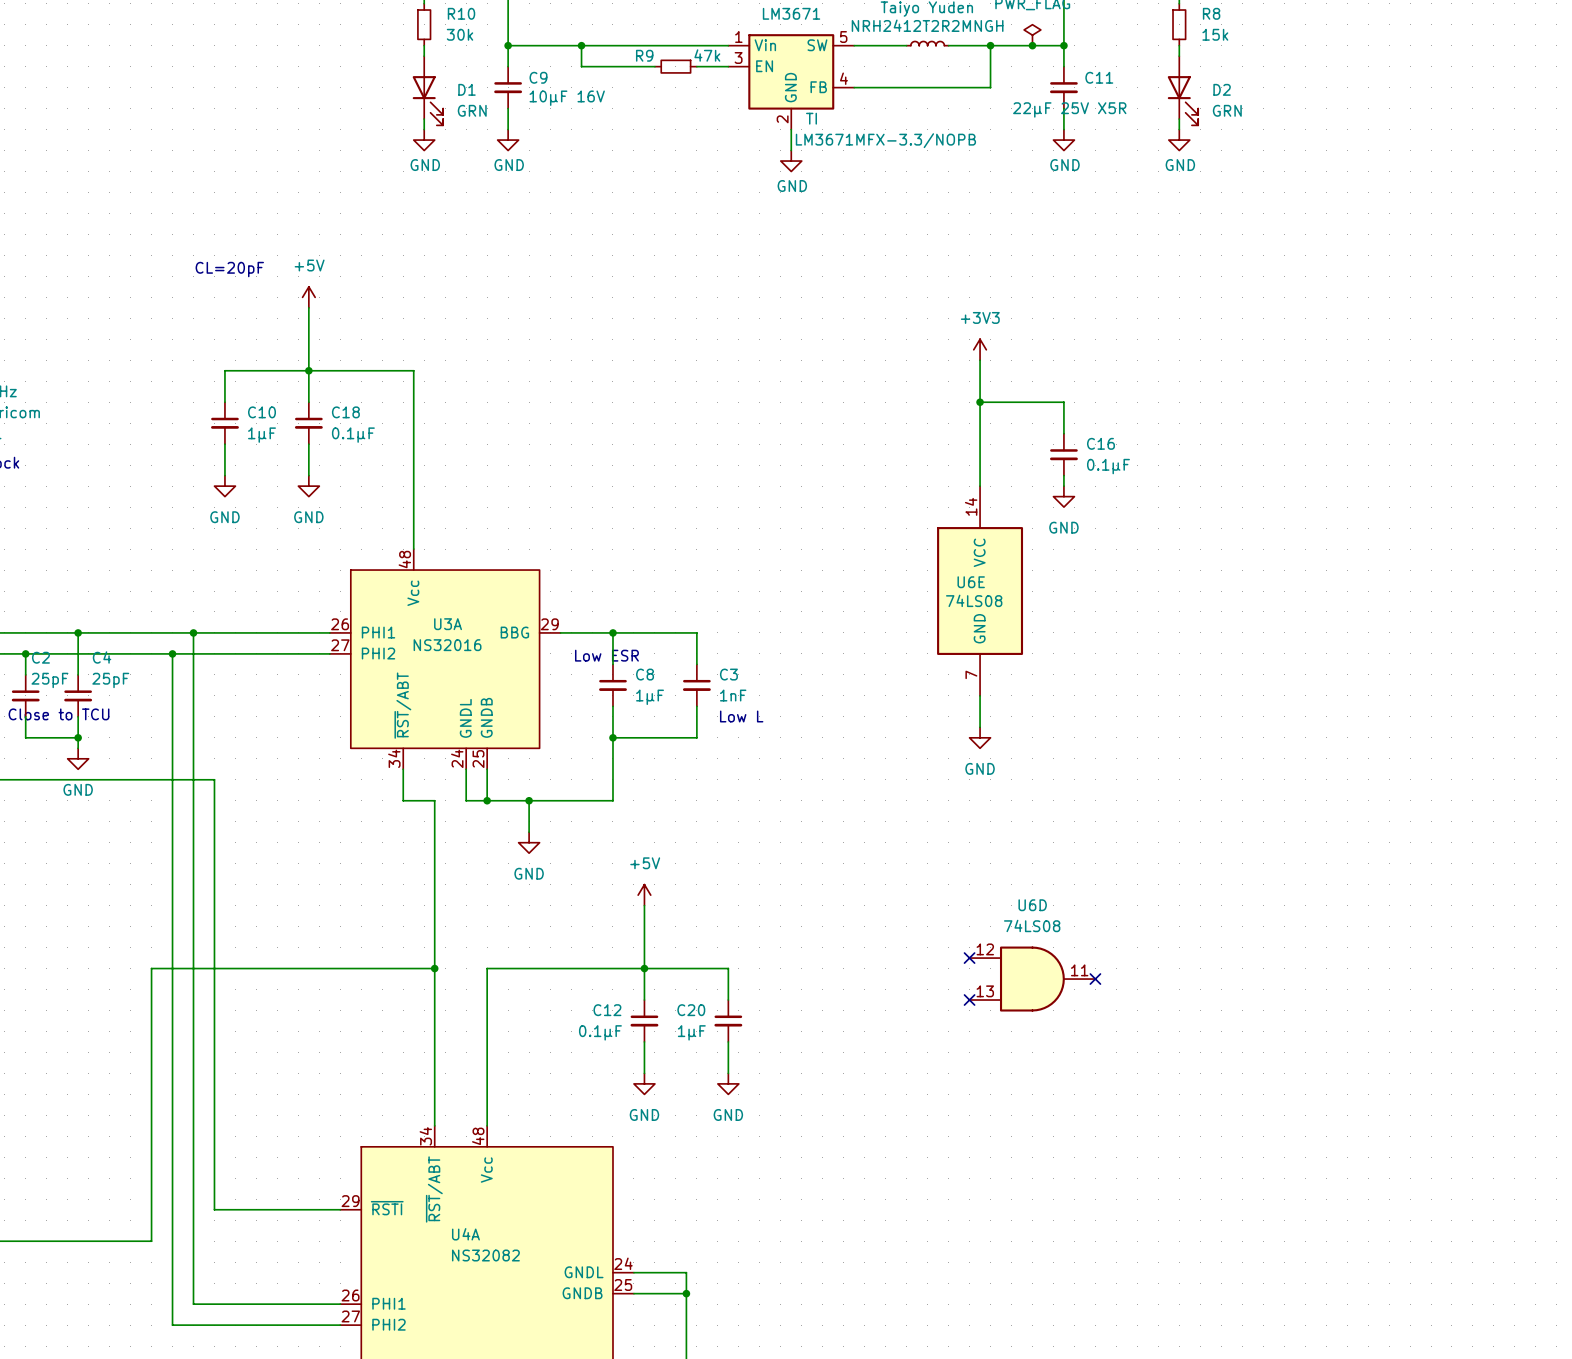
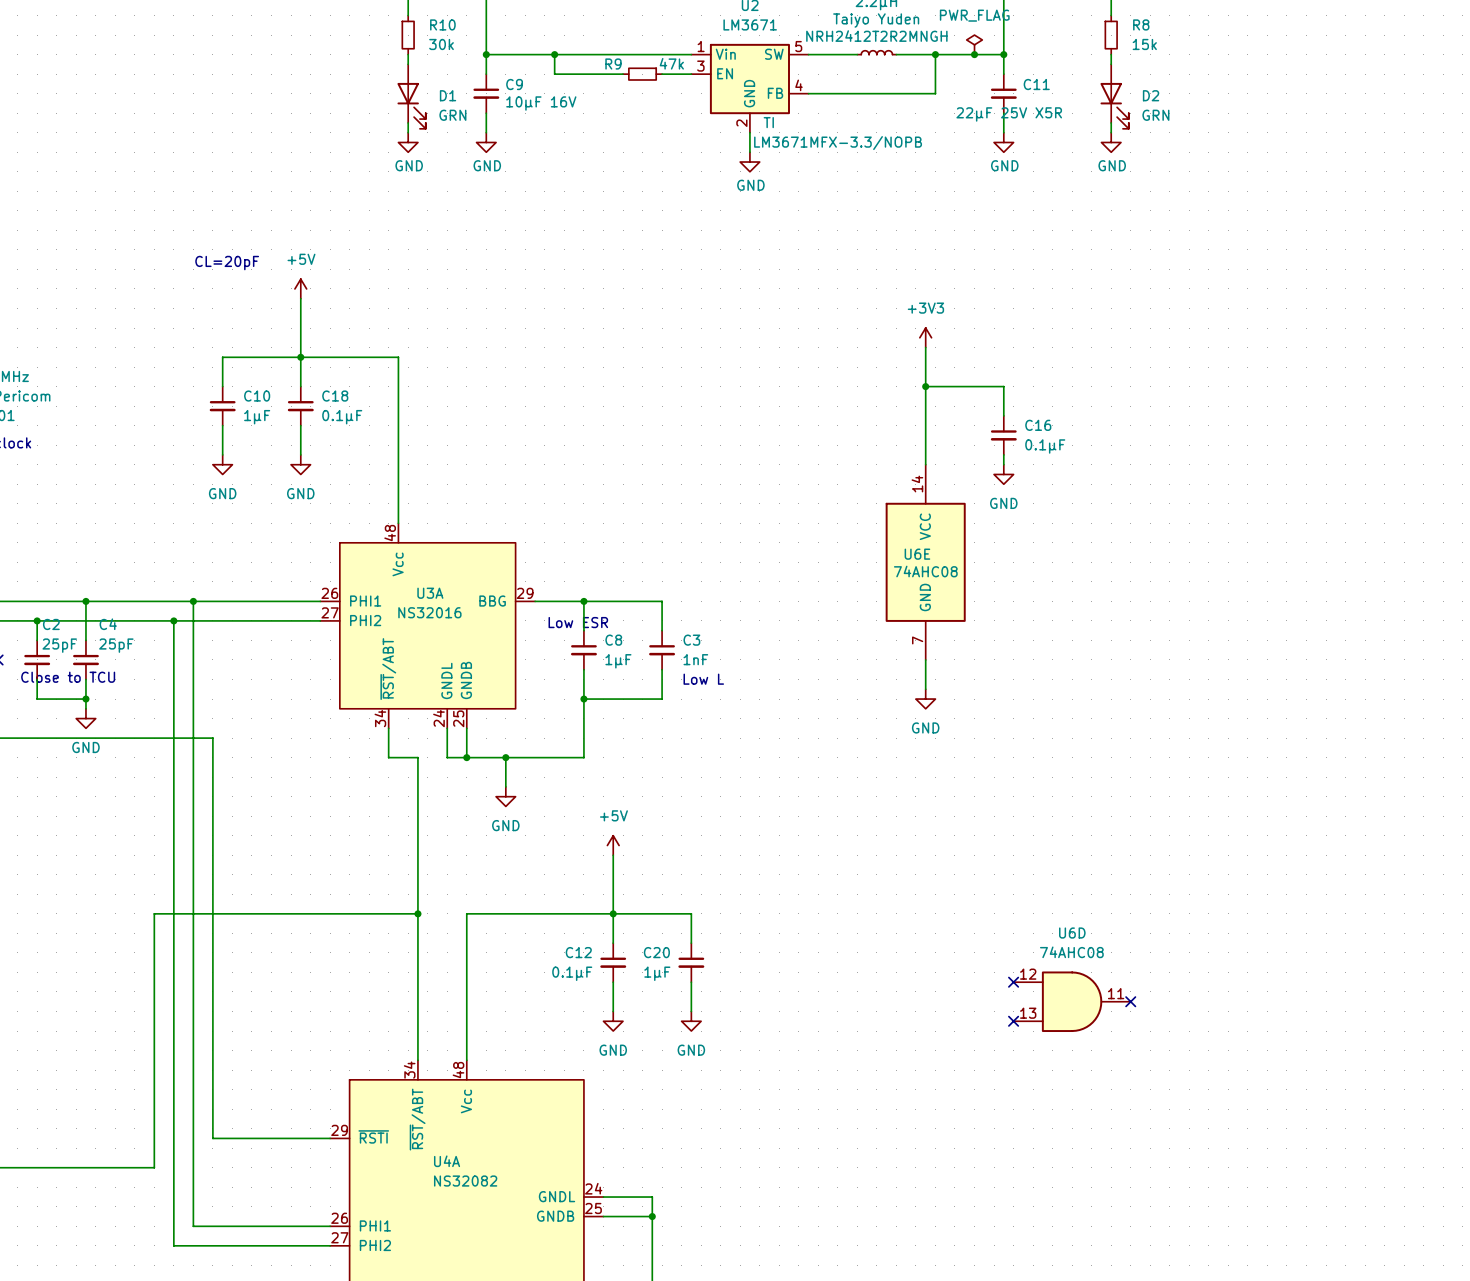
U6E value: 74LS08 (974, 600) -> 74AHC08 (925, 571)
U6D value: 74LS08 (1032, 925) -> 74AHC08 (1071, 952)
no-connect mark: (969, 958) -> none
U6D position: (1032, 979) -> (1072, 1001)
no-connect mark: (1095, 979) -> none
no-connect mark: (969, 1000) -> none
no-connect mark: none -> (1013, 982)
no-connect mark: none -> (1130, 1001)
no-connect mark: none -> (1013, 1021)

